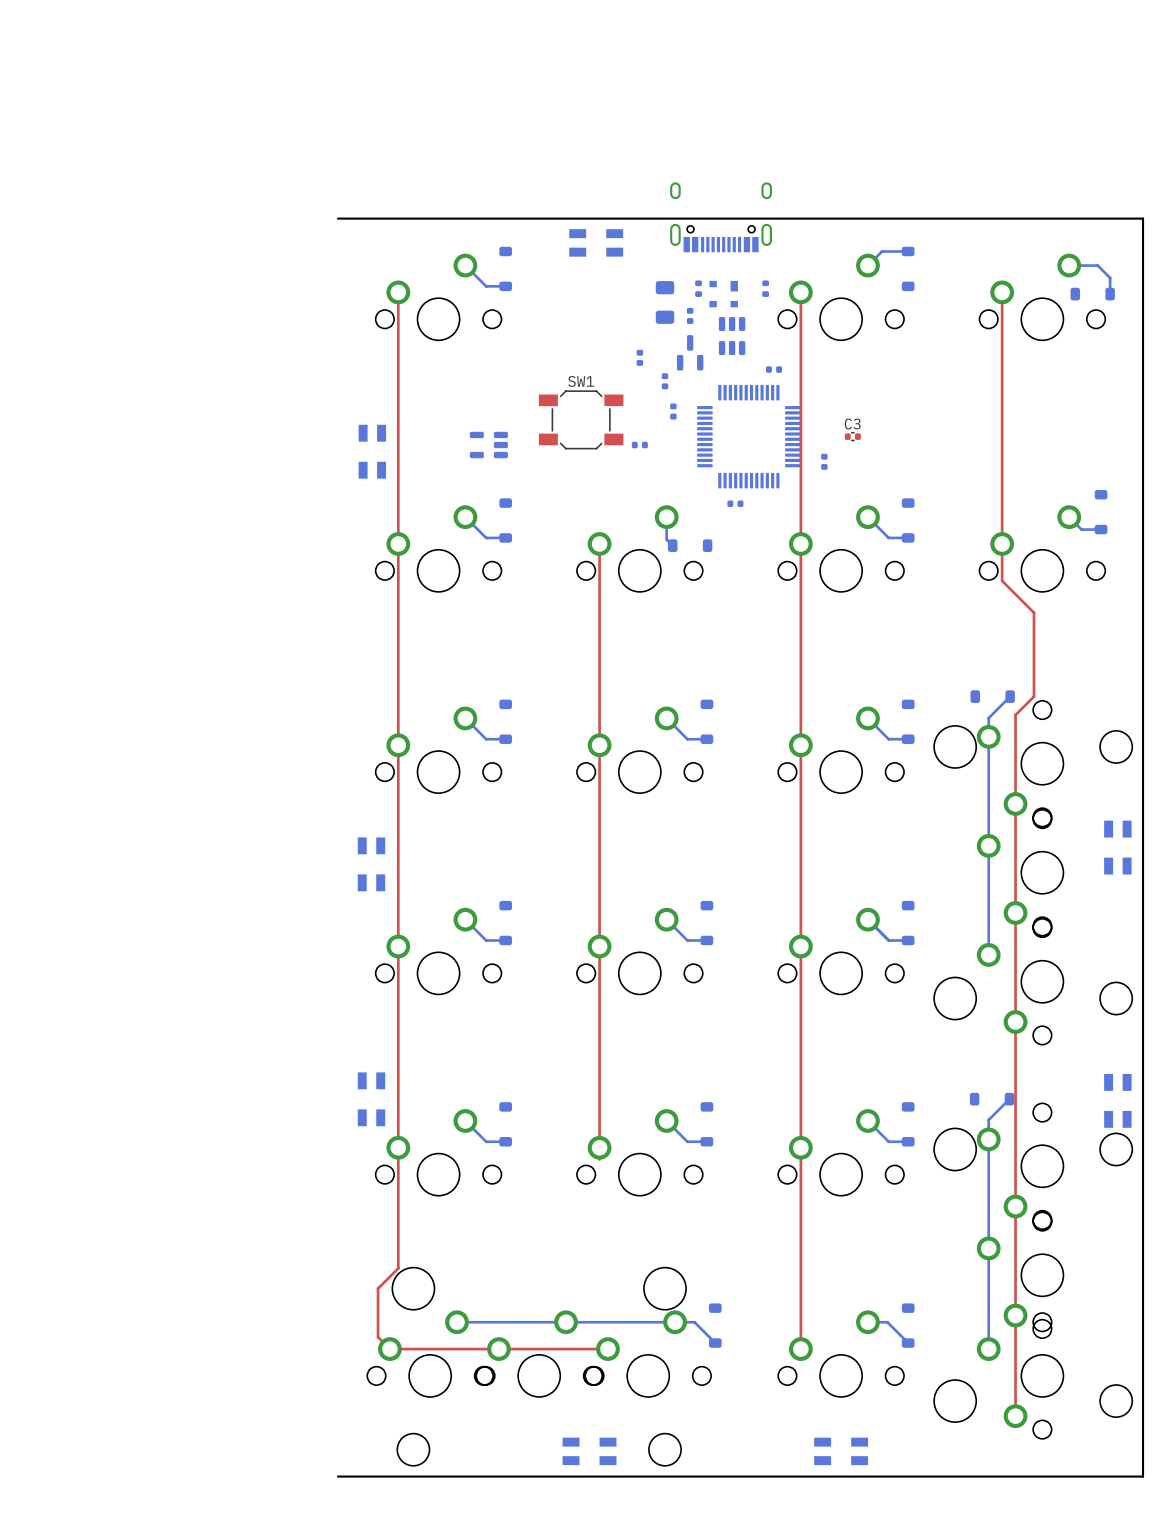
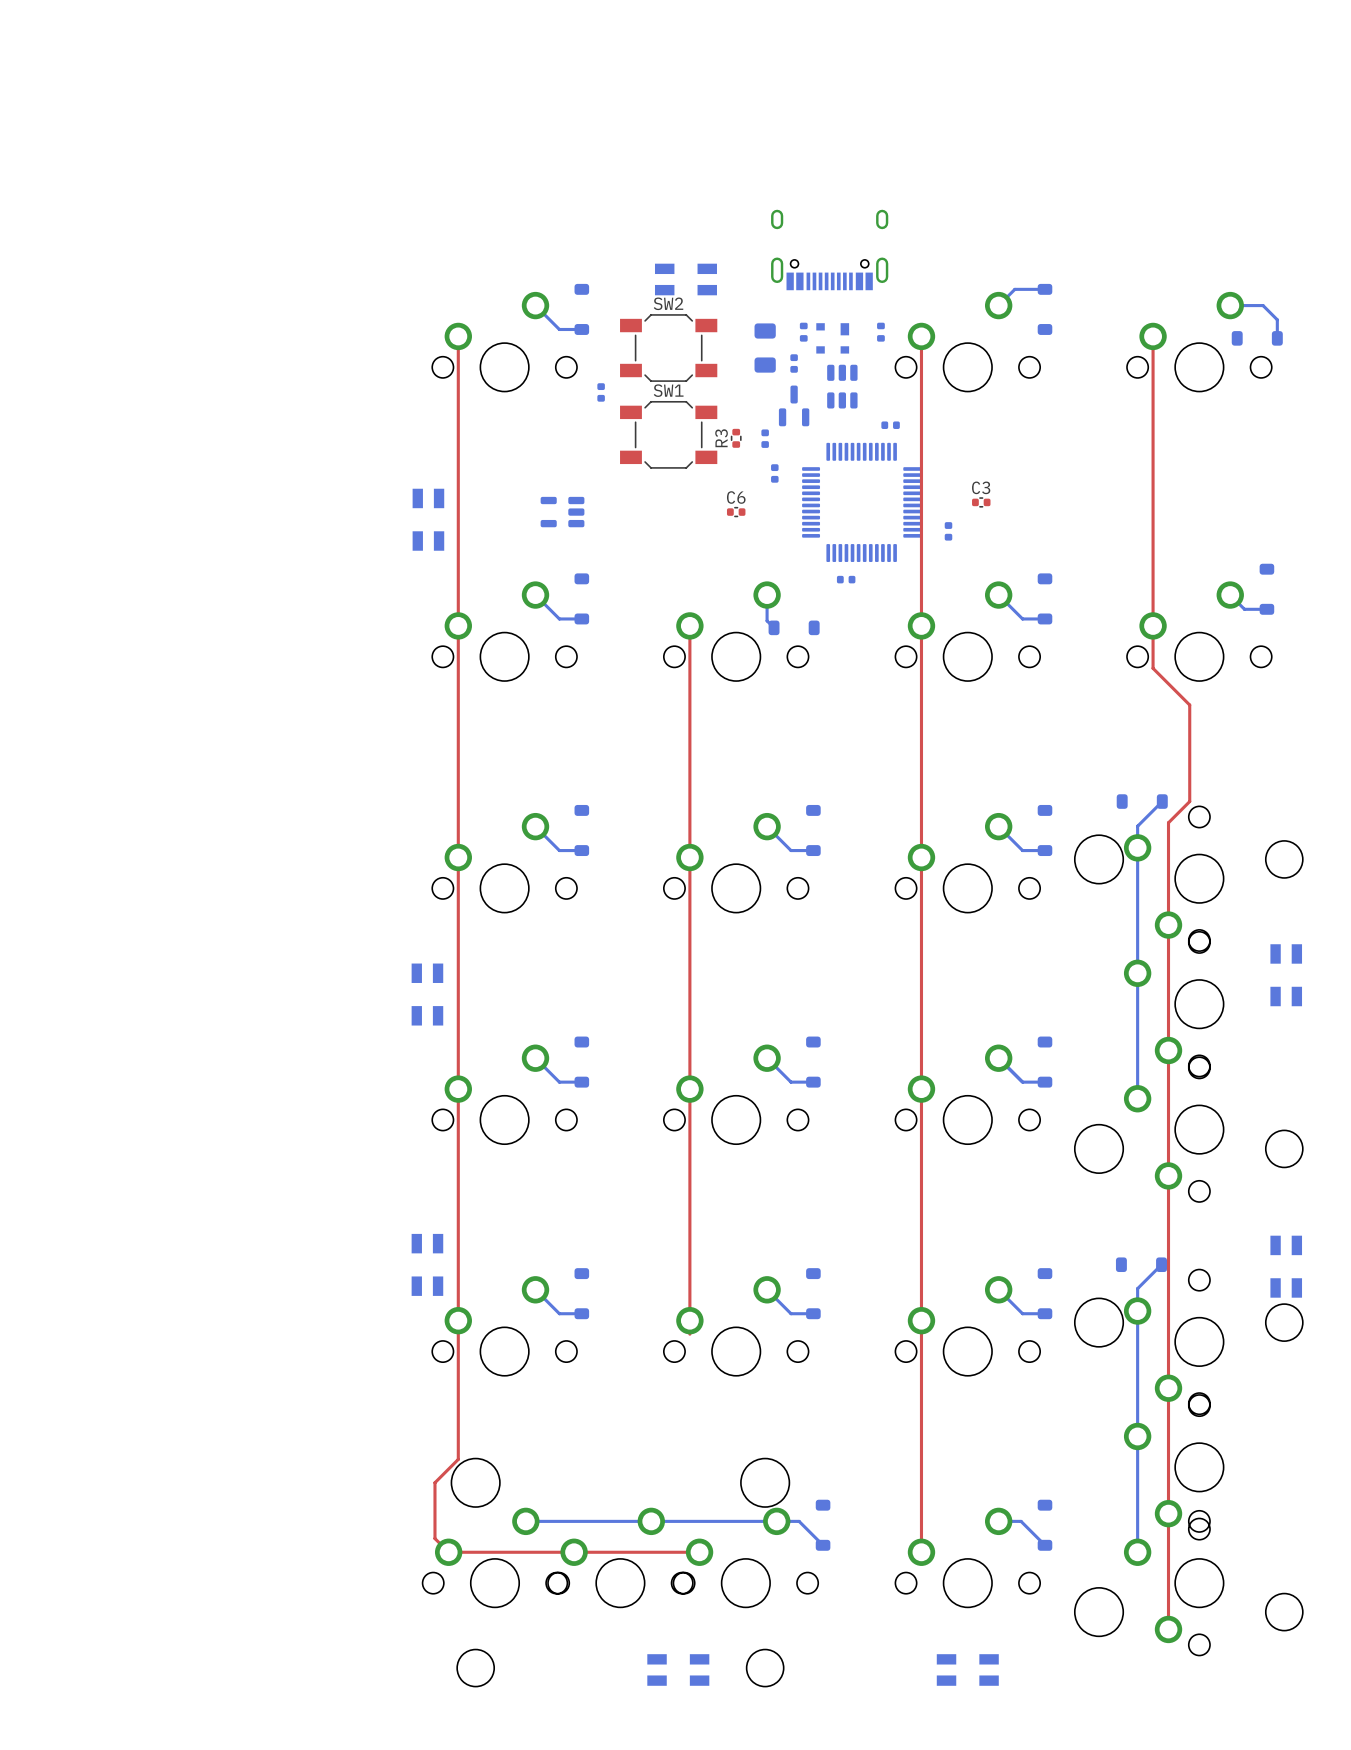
board edge: (337, 218) (1143, 218) (1143, 1476) (337, 1476) -> none
SW2: none -> (668, 348)
part position: (639, 357) -> (601, 392)
R3: none -> (736, 438)
SW1 position: (581, 419) -> (668, 434)
C6 side: bottom (639, 445) -> top (736, 512)

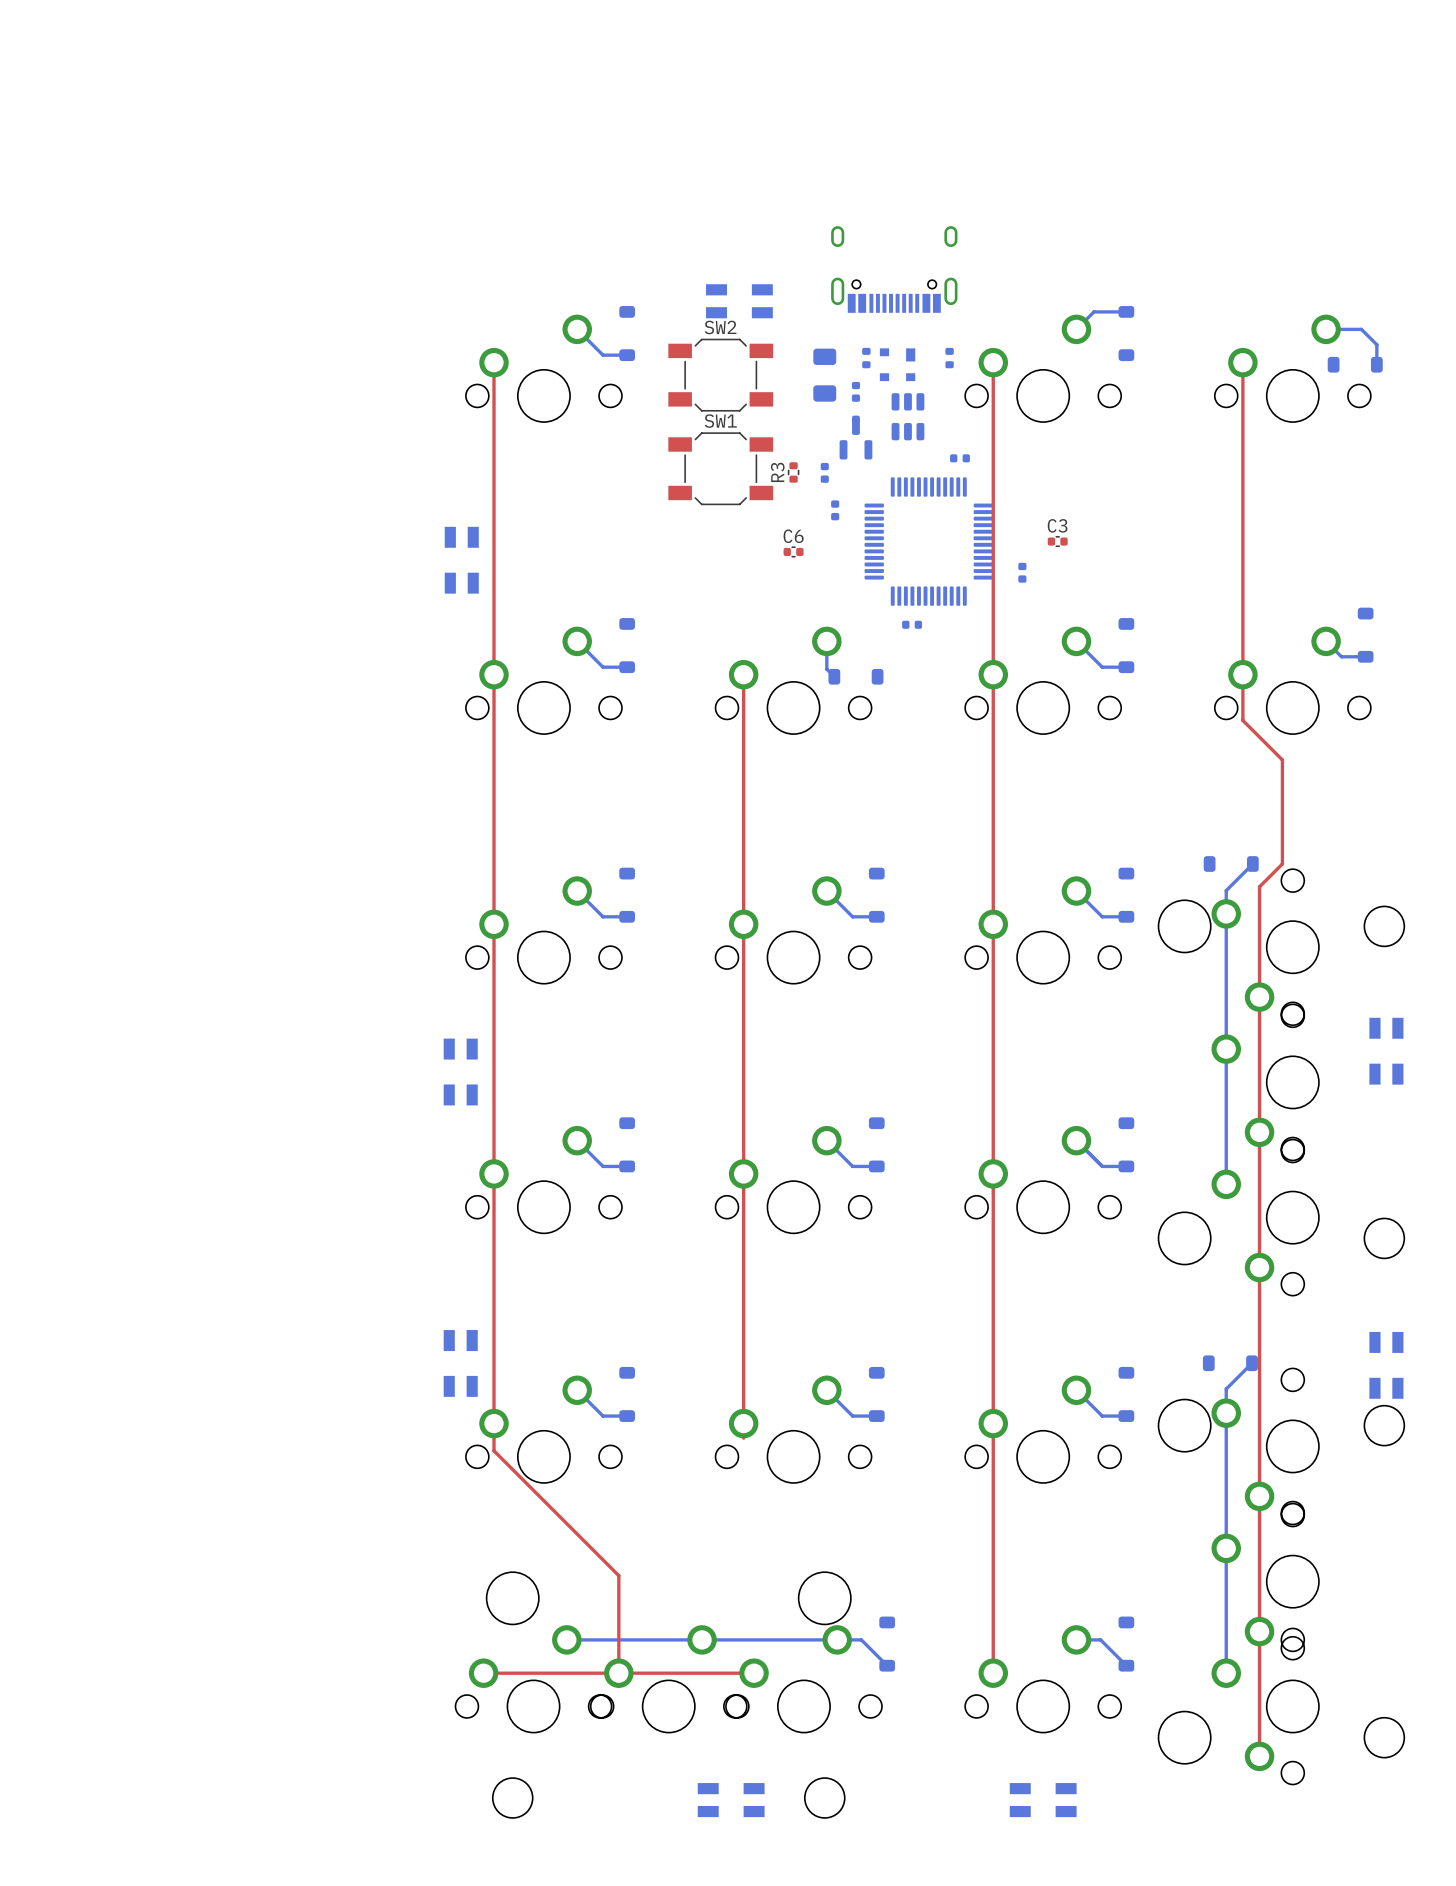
part: (601, 392) -> none
part: (562, 512) -> none
top track: (458, 1346) (458, 1459) (434, 1482) (434, 1538) (448, 1552) -> (494, 1450) (618, 1575) (618, 1673)

